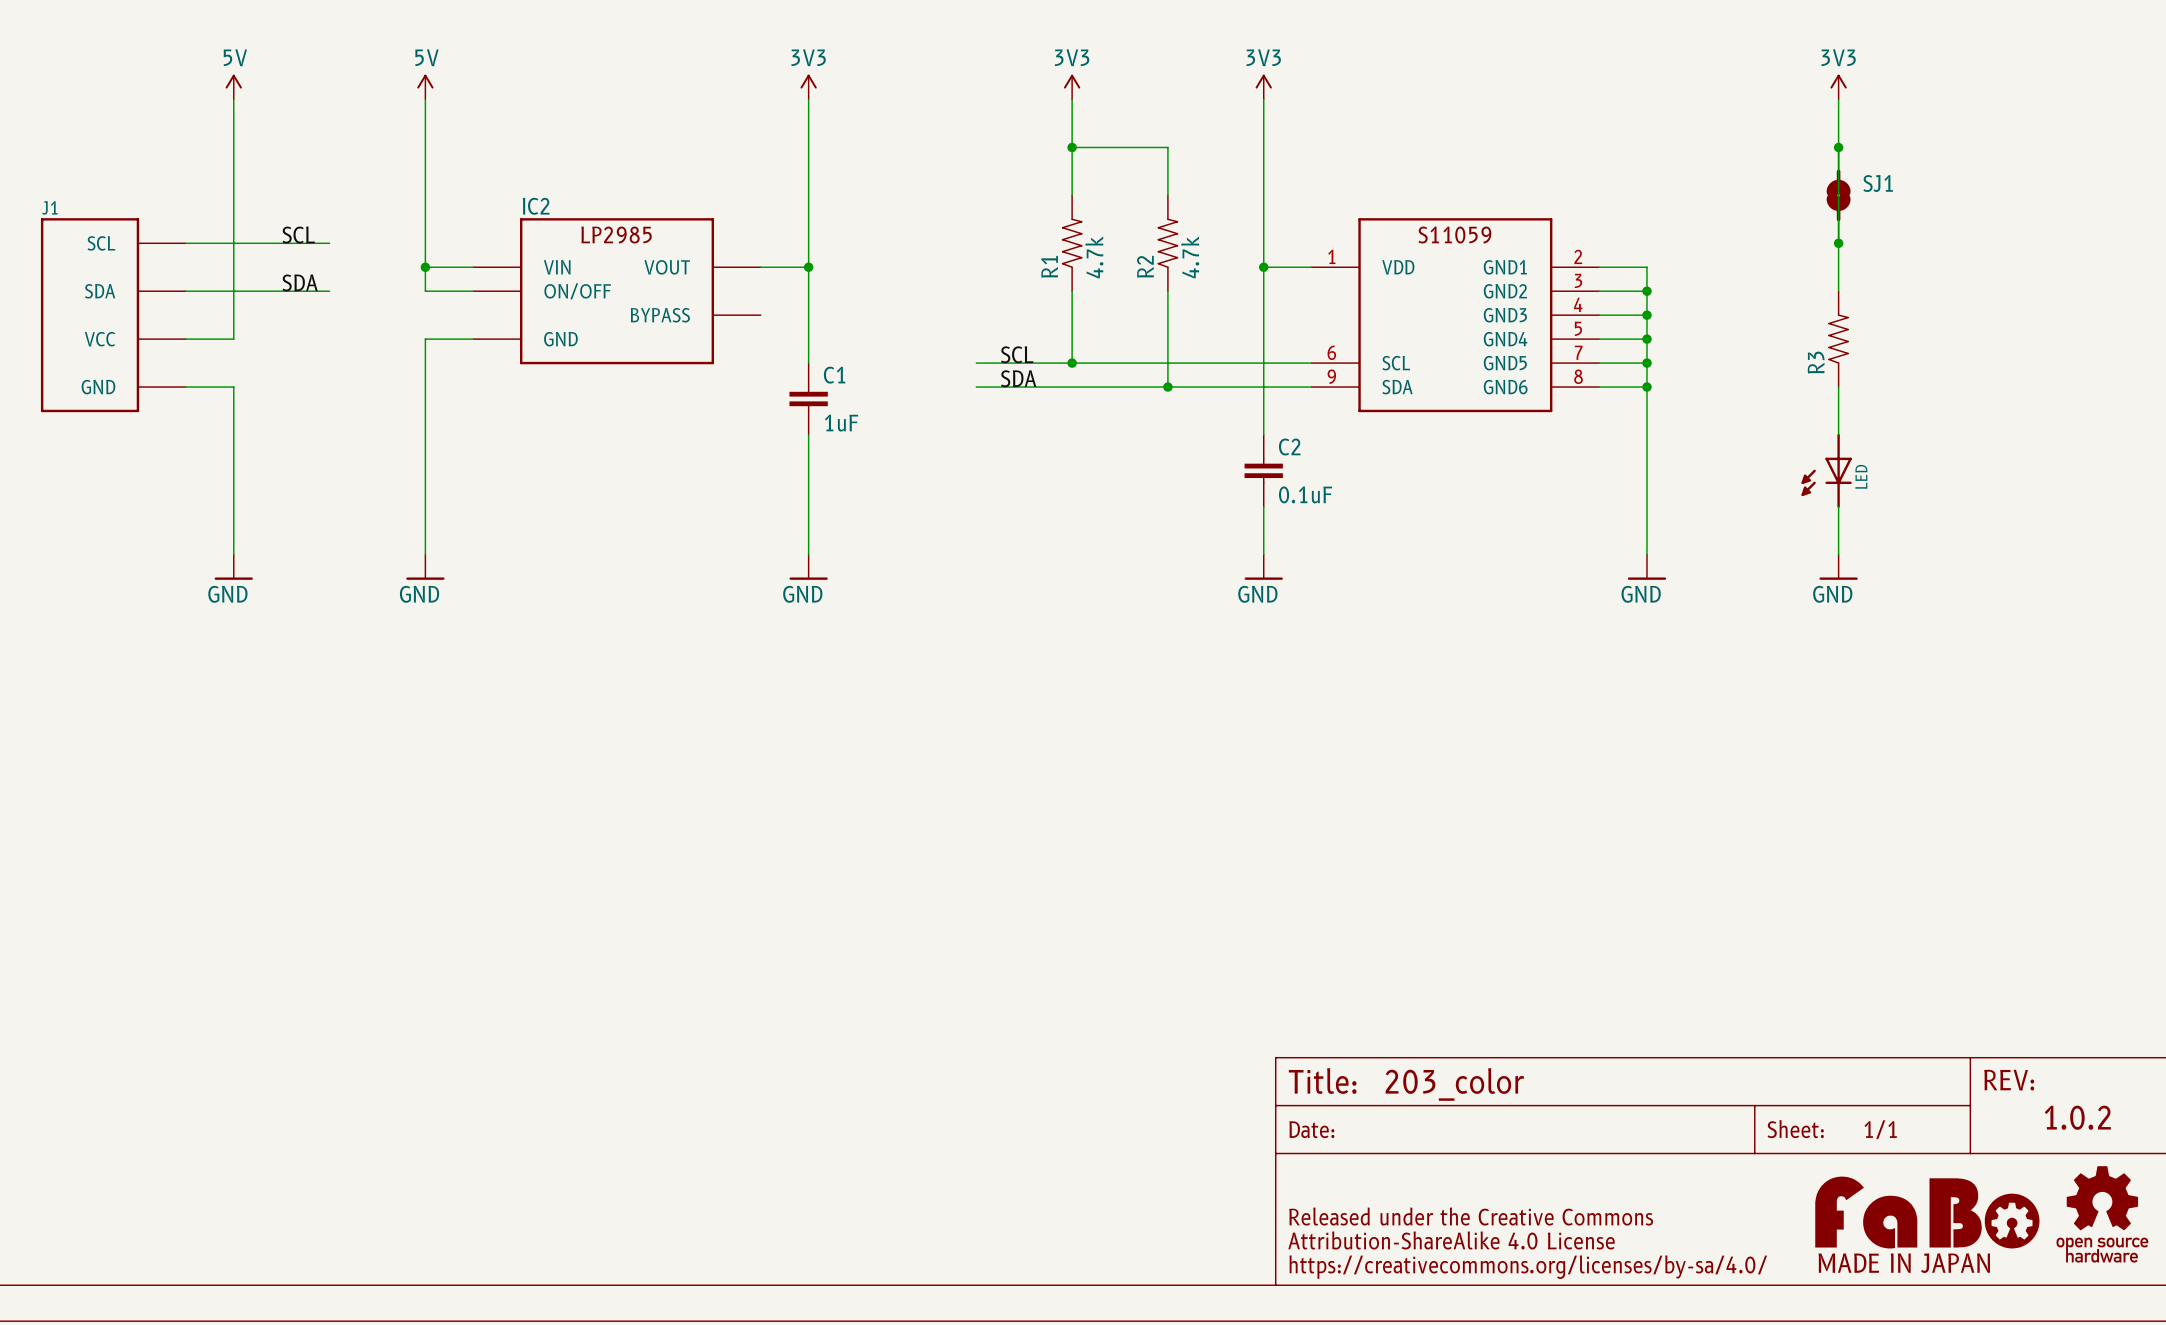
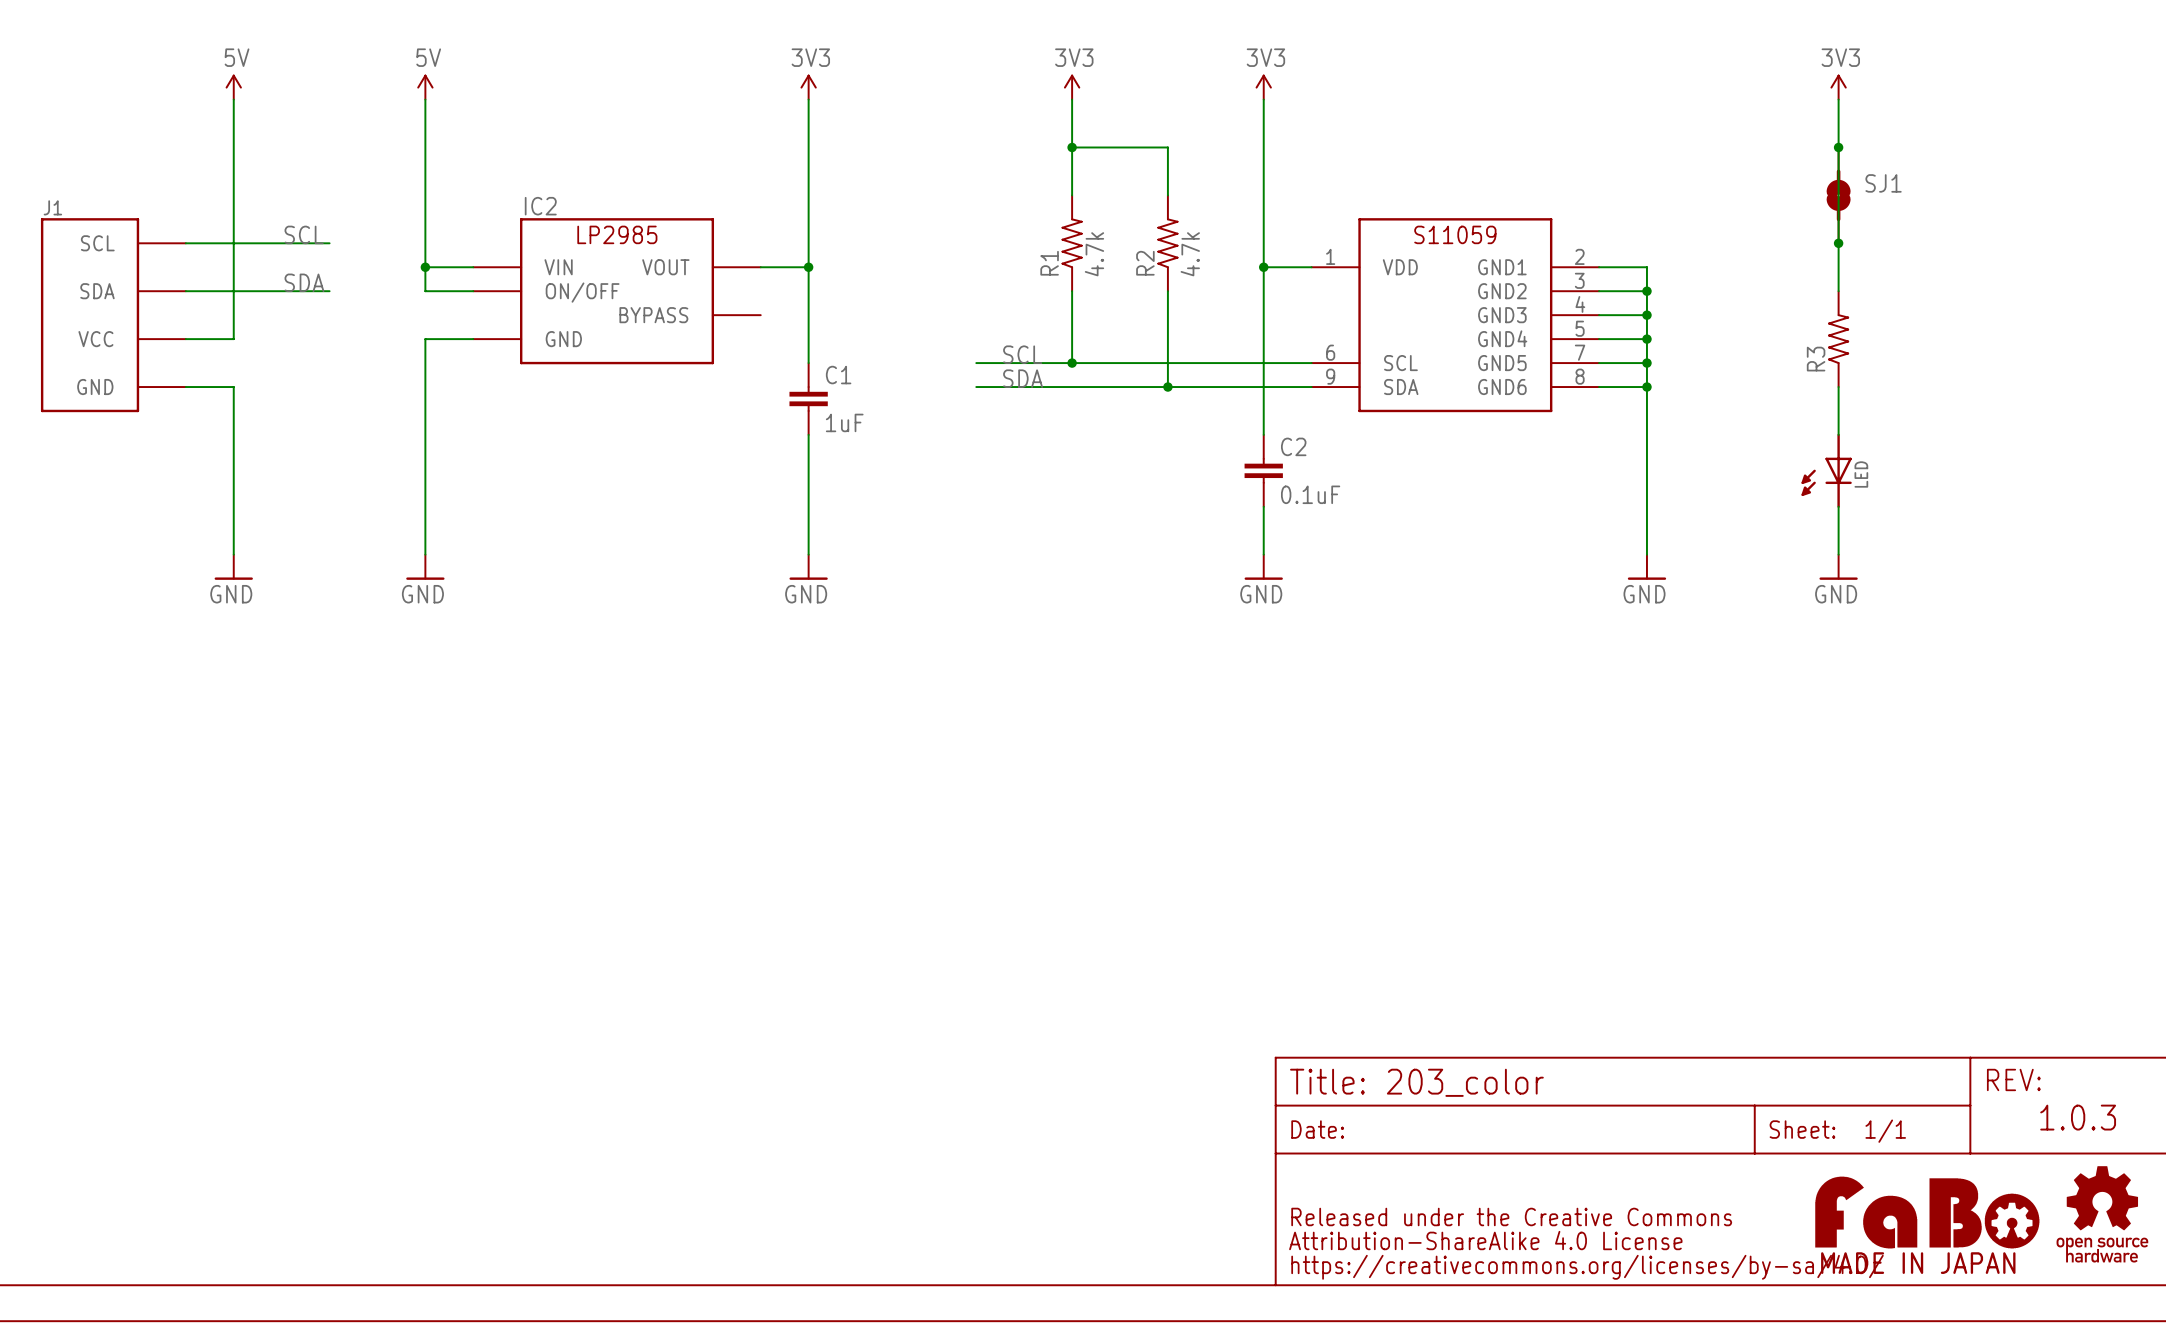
text: 1.0.2 (2077, 1117) -> 1.0.3 (2078, 1117)

